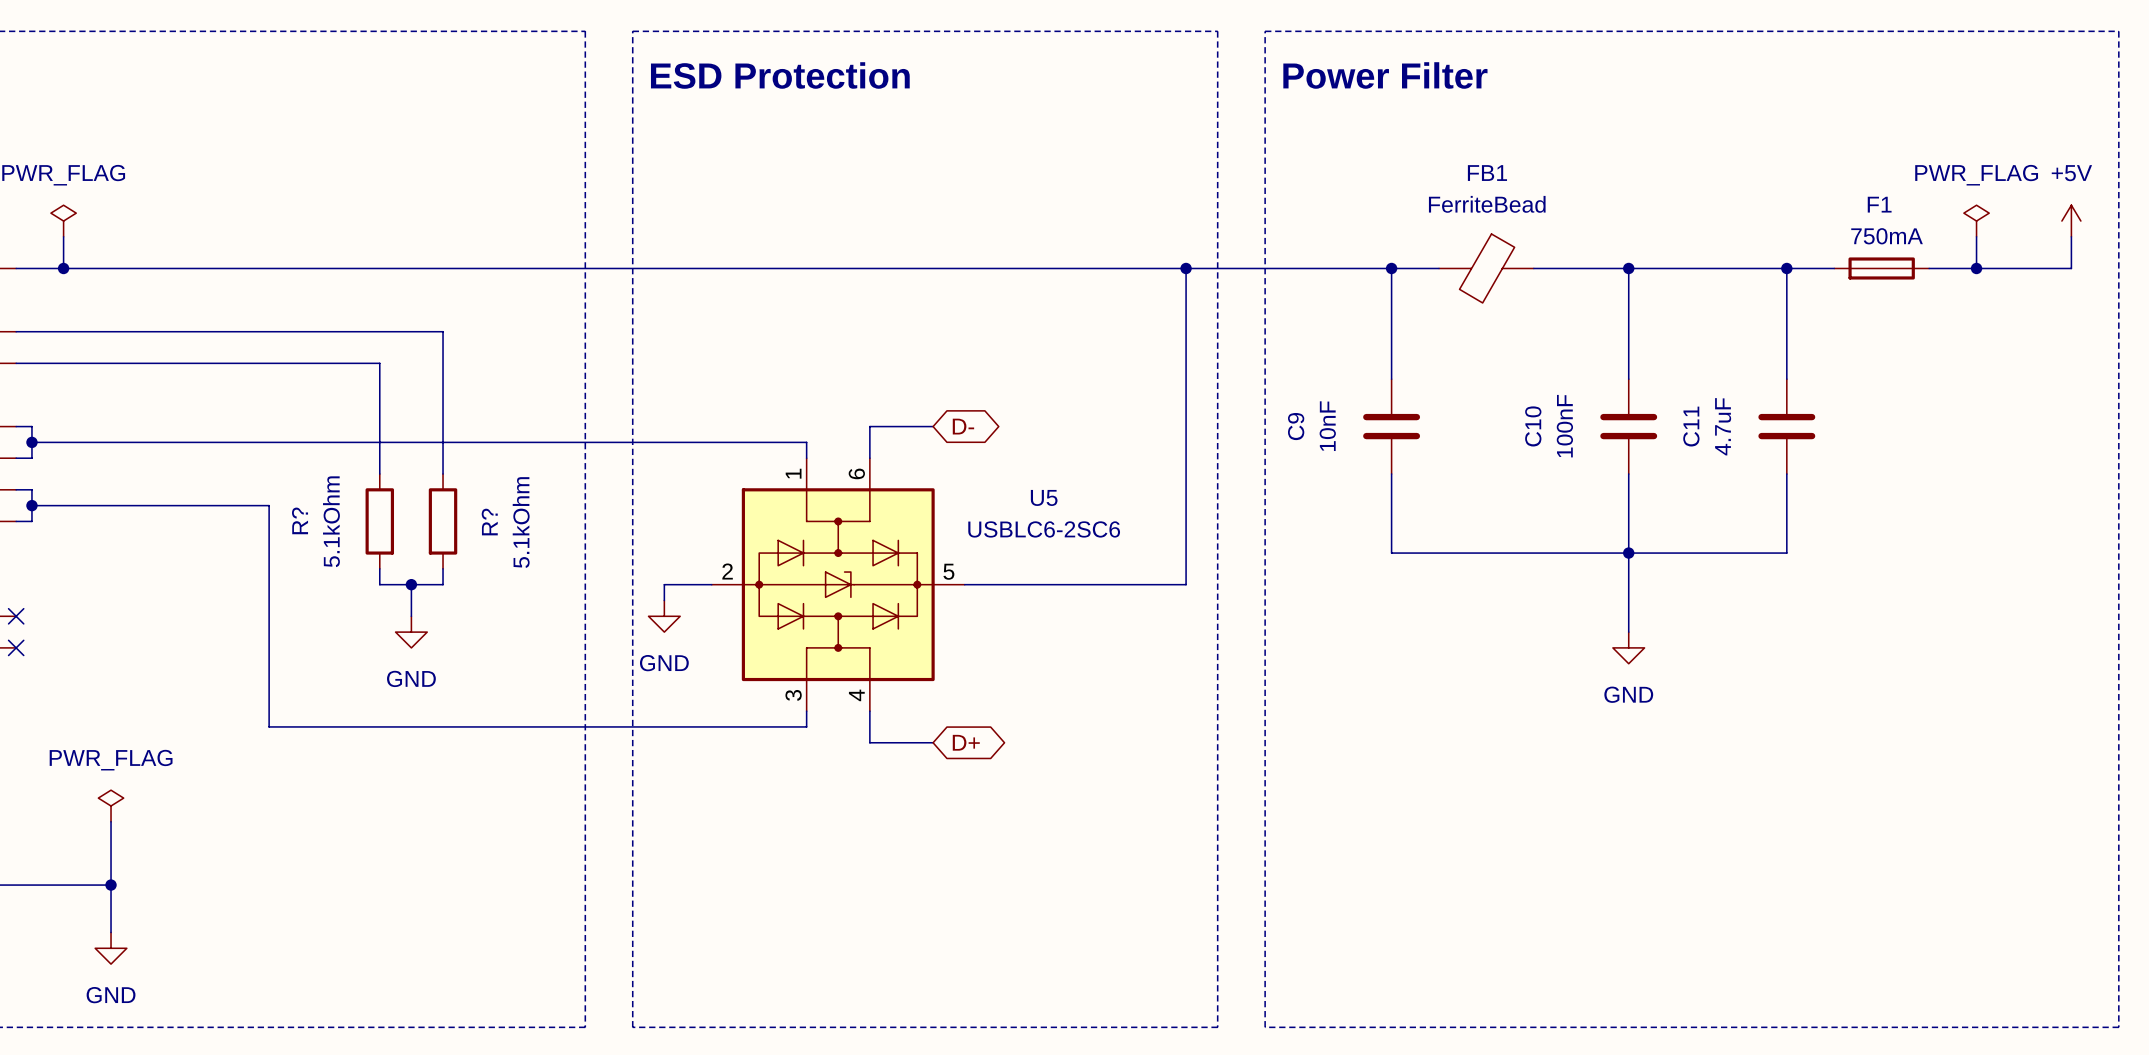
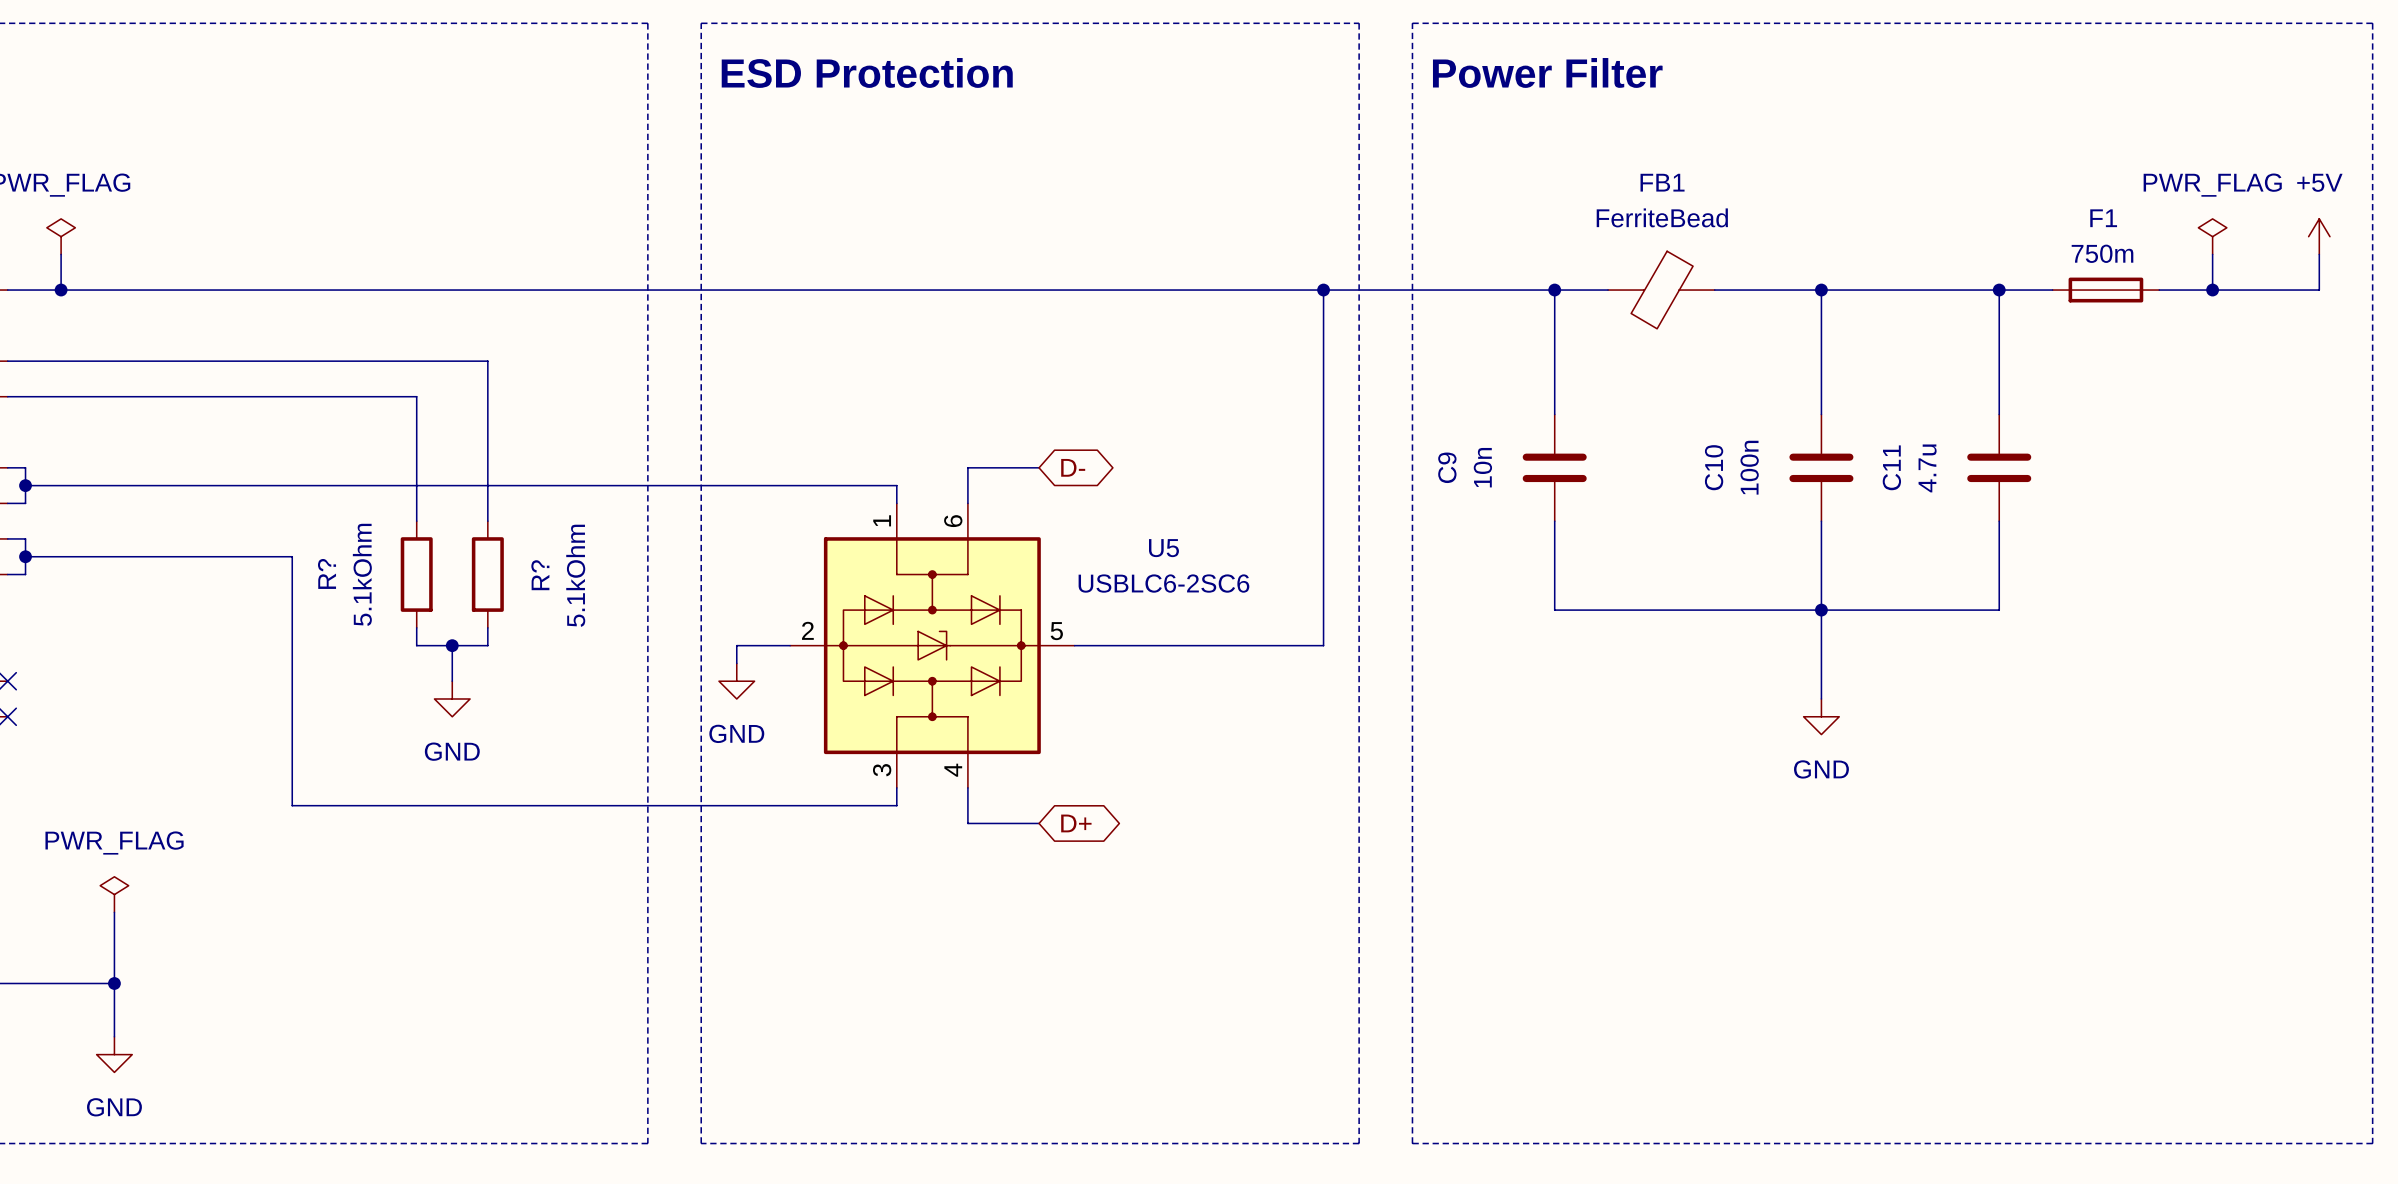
F1 value: 750mA (1887, 236) -> 750m (2102, 253)
C9 value: 10nF (1327, 426) -> 10n (1482, 467)
C10 value: 100nF (1564, 426) -> 100n (1749, 467)
C11 value: 4.7uF (1723, 426) -> 4.7u (1927, 468)

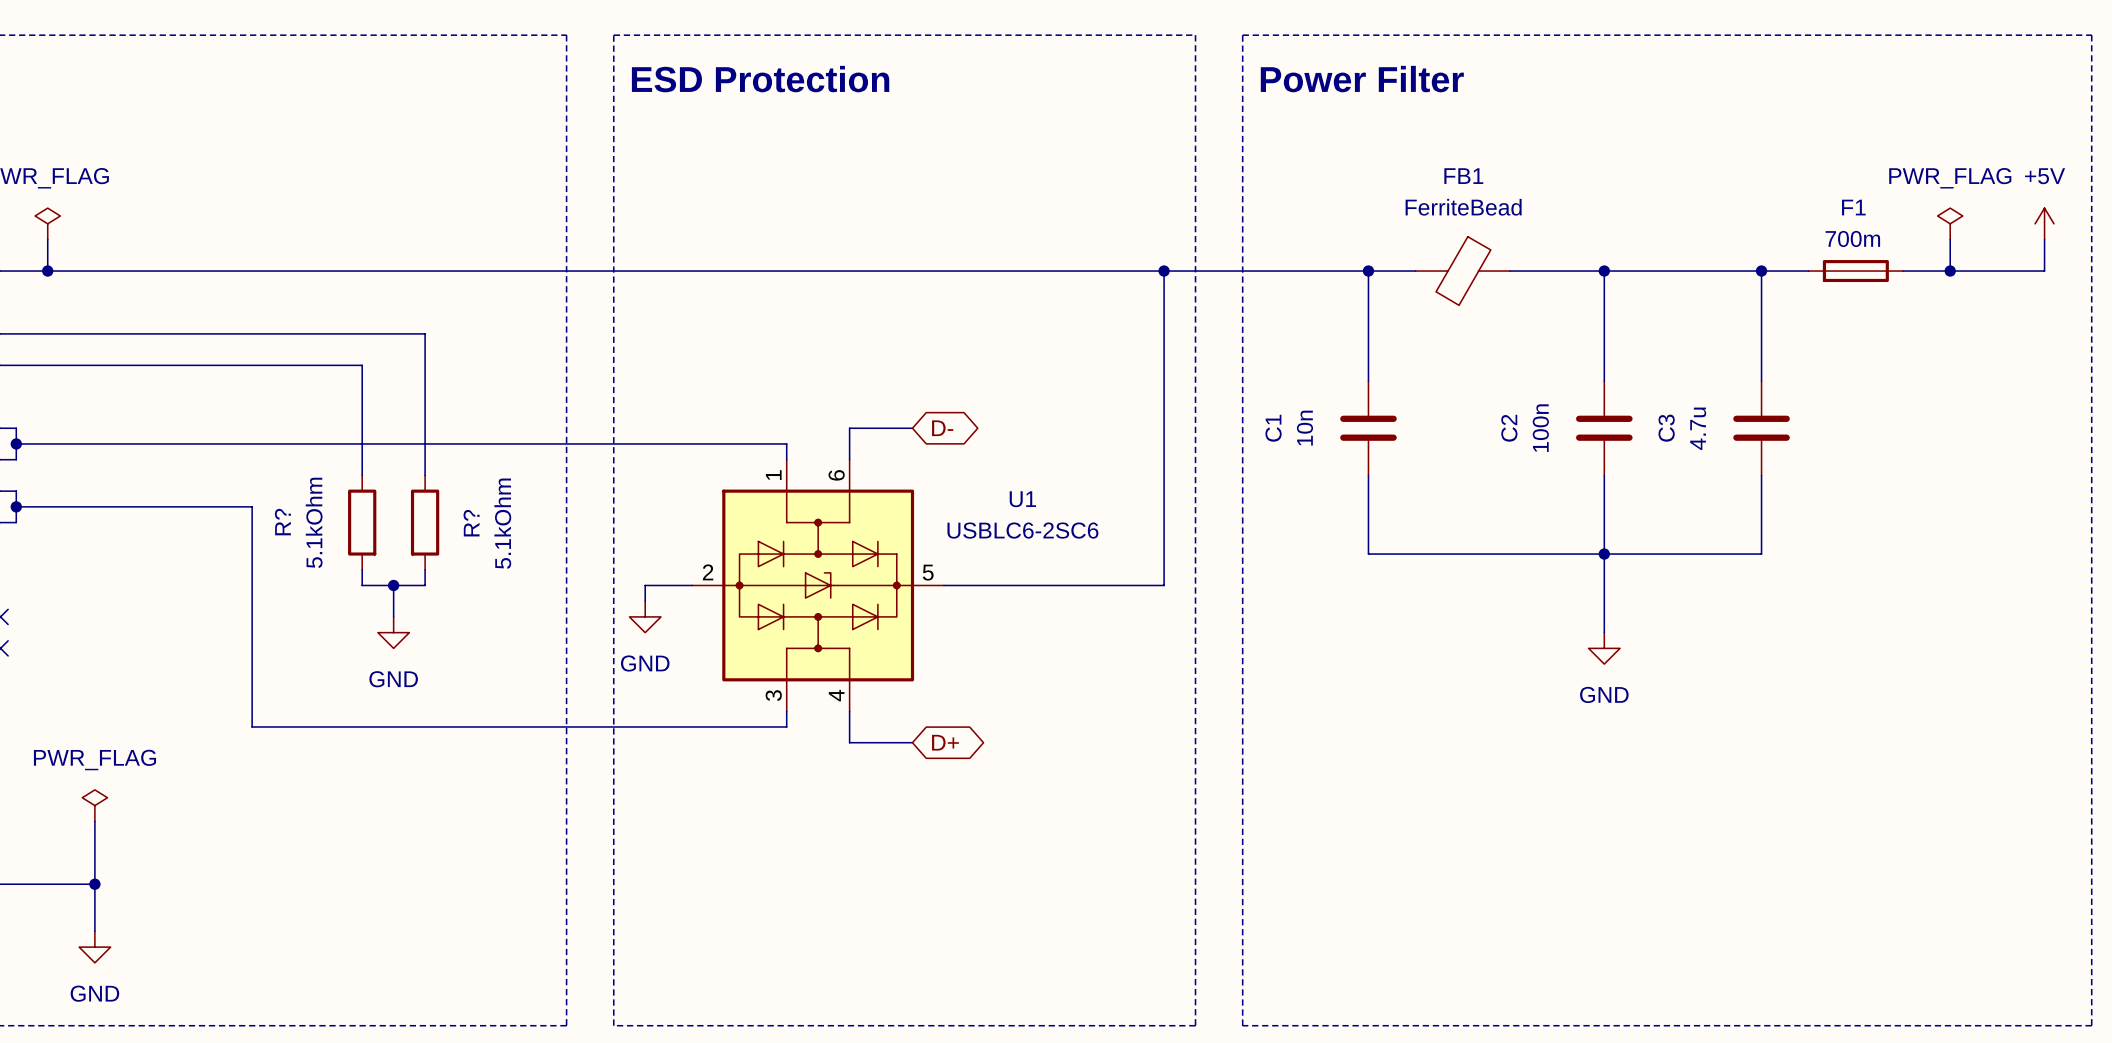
F1 value: 750m (2102, 253) -> 700m (1852, 238)
C9 name: C9 (1447, 467) -> C1 (1273, 428)
C10 name: C10 (1714, 467) -> C2 (1509, 428)
C11 name: C11 (1891, 467) -> C3 (1666, 428)
U5 name: U5 (1163, 548) -> U1 (1022, 499)

